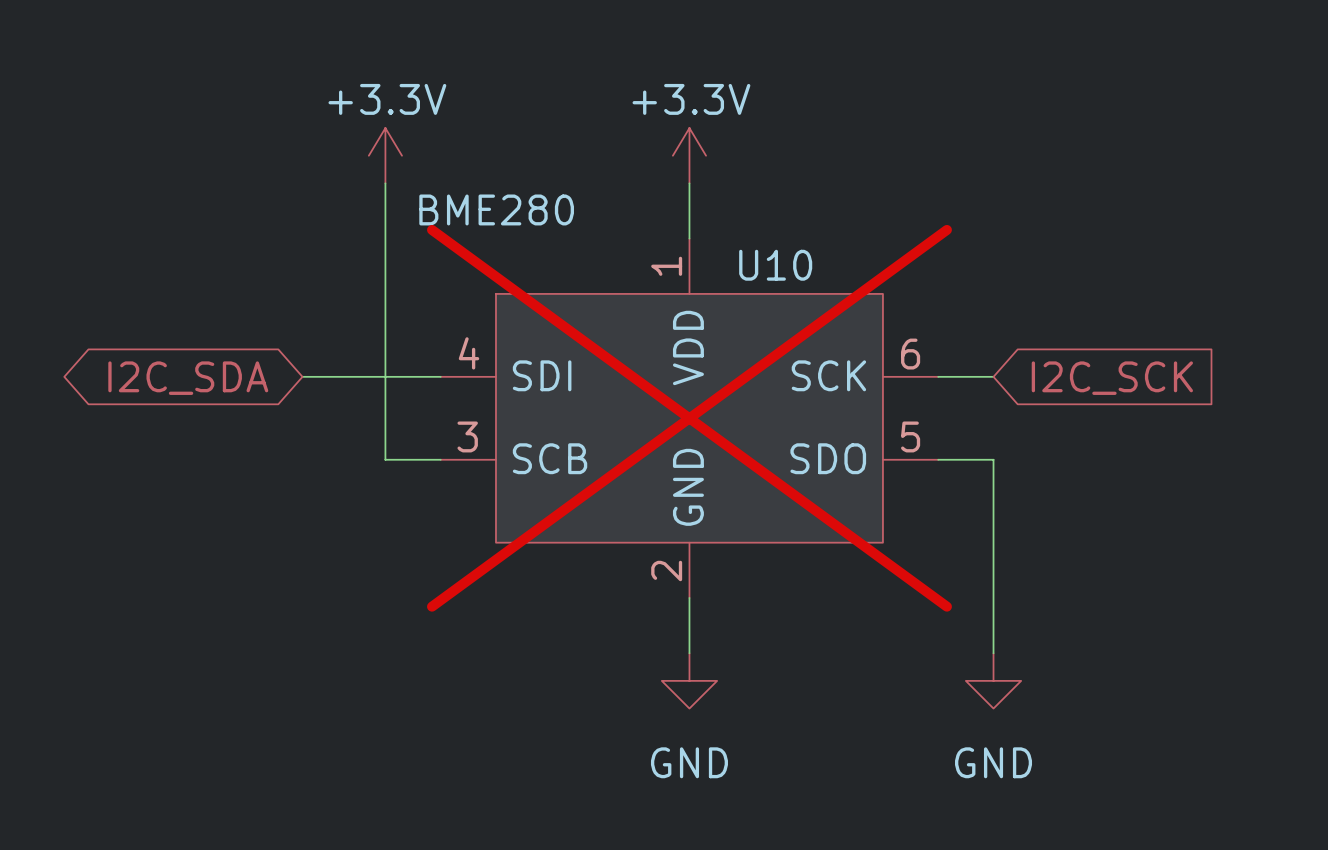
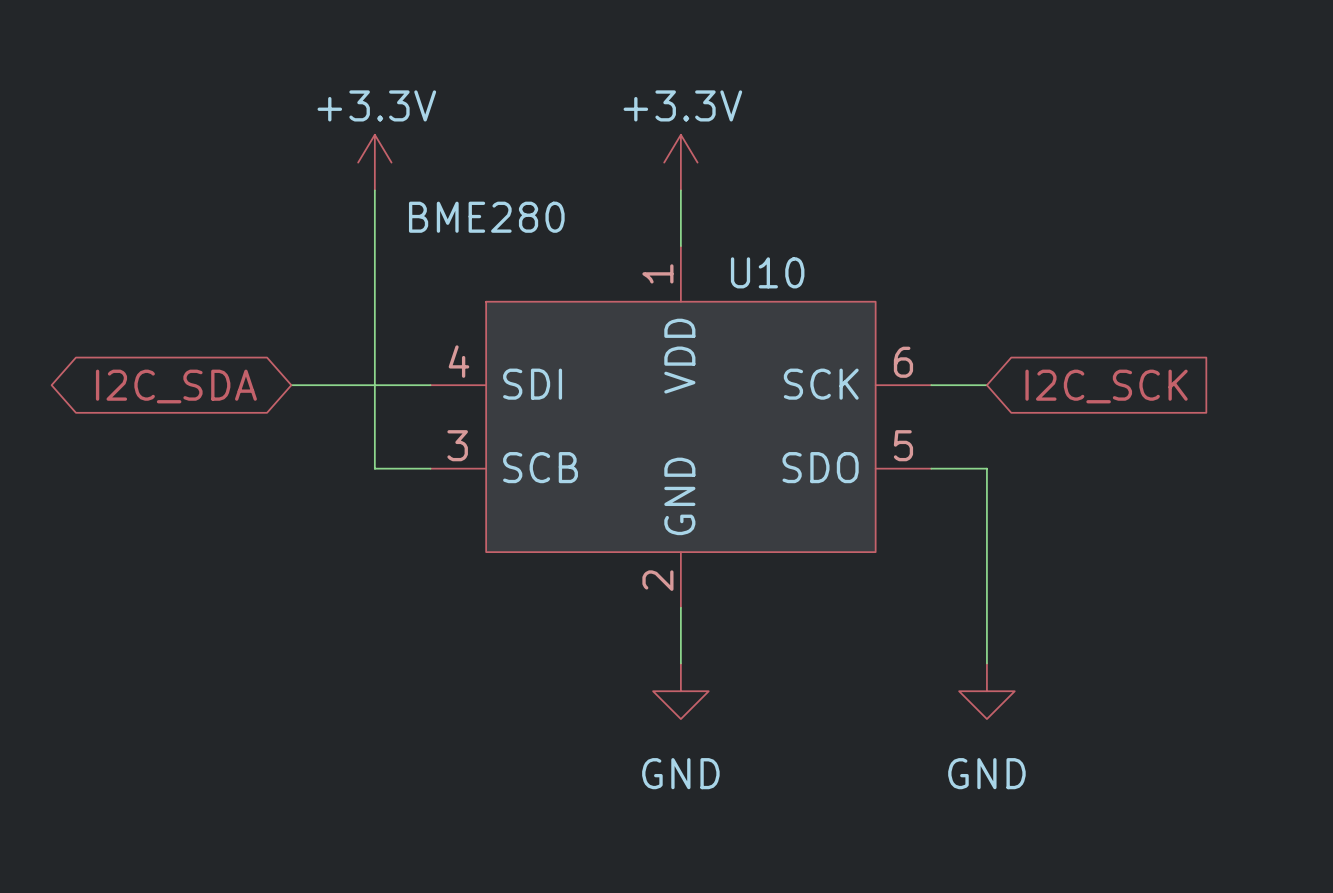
U10 do-not-place cross: (689, 418) -> none

